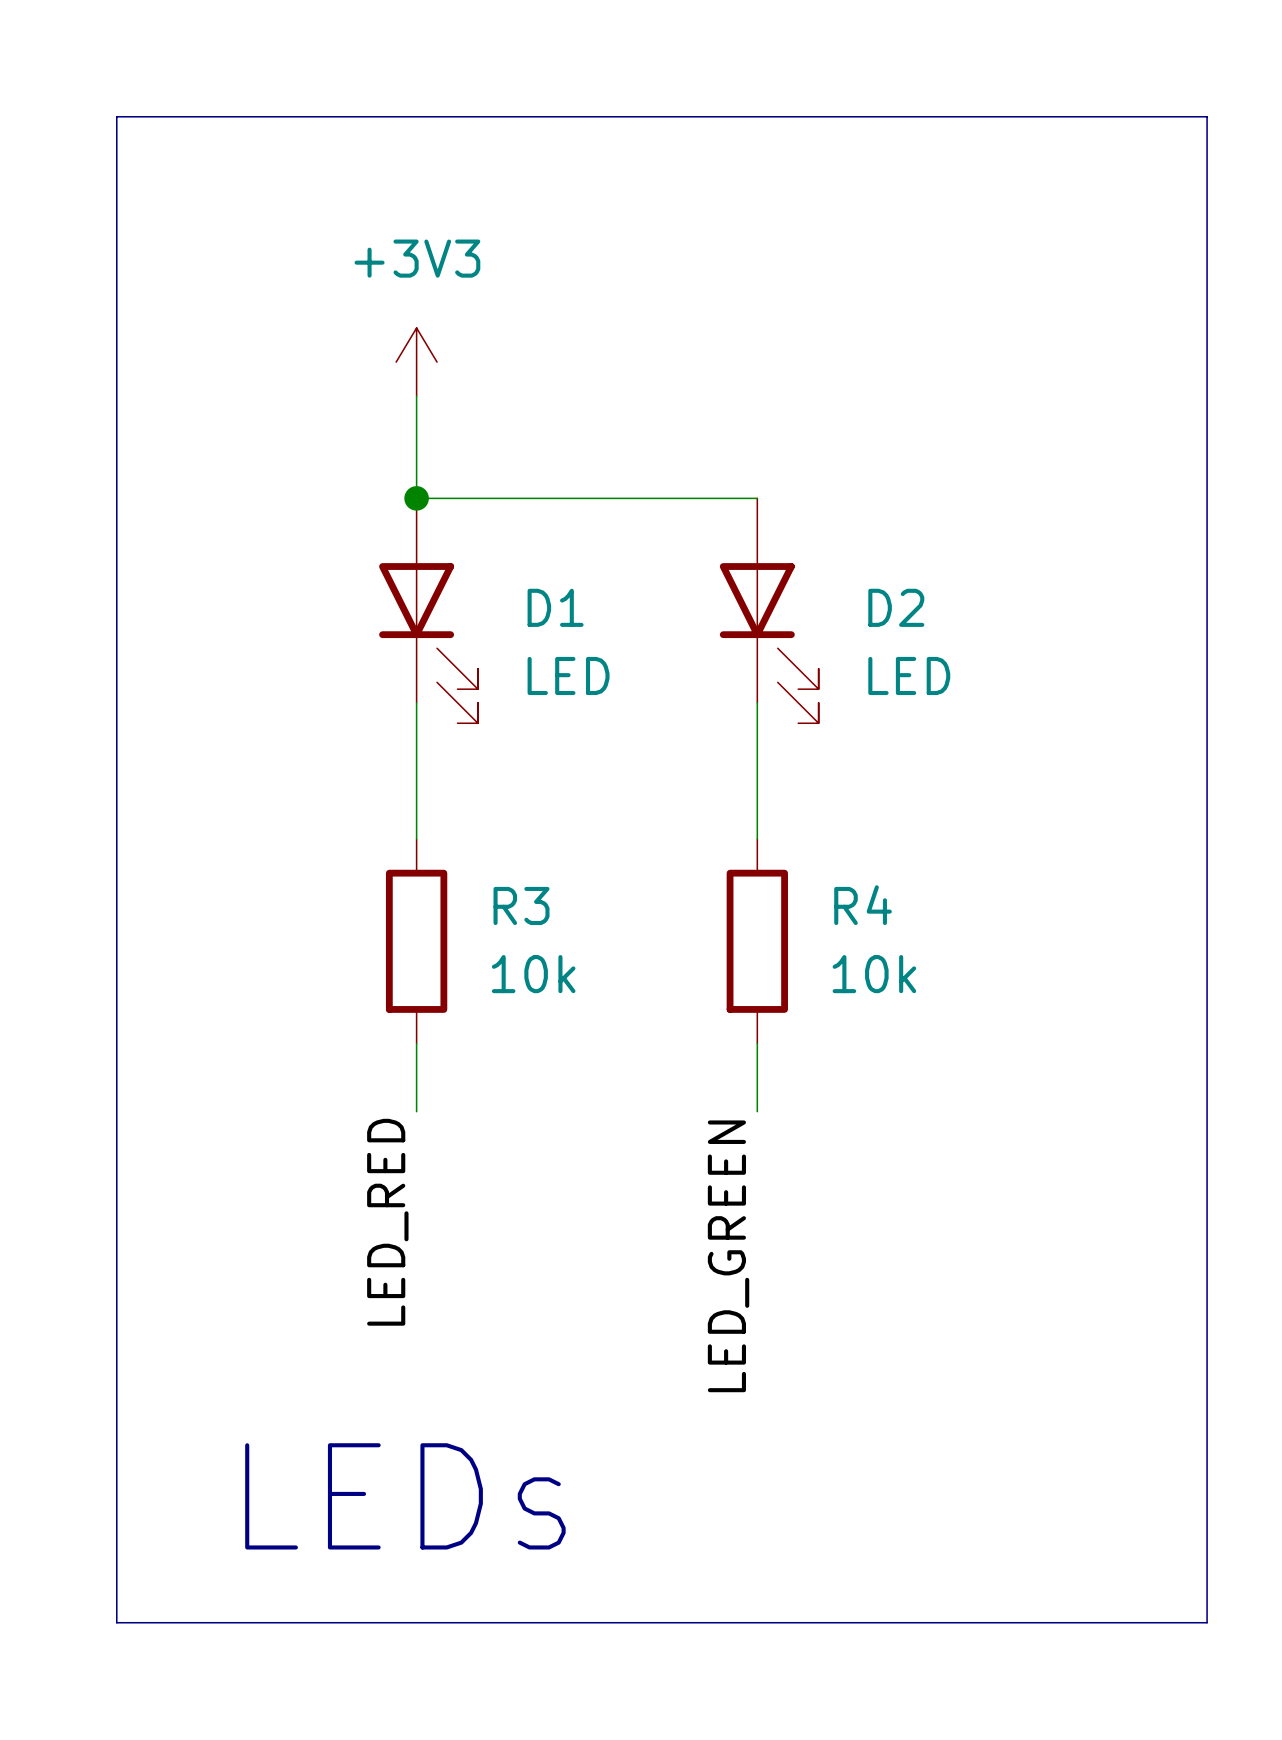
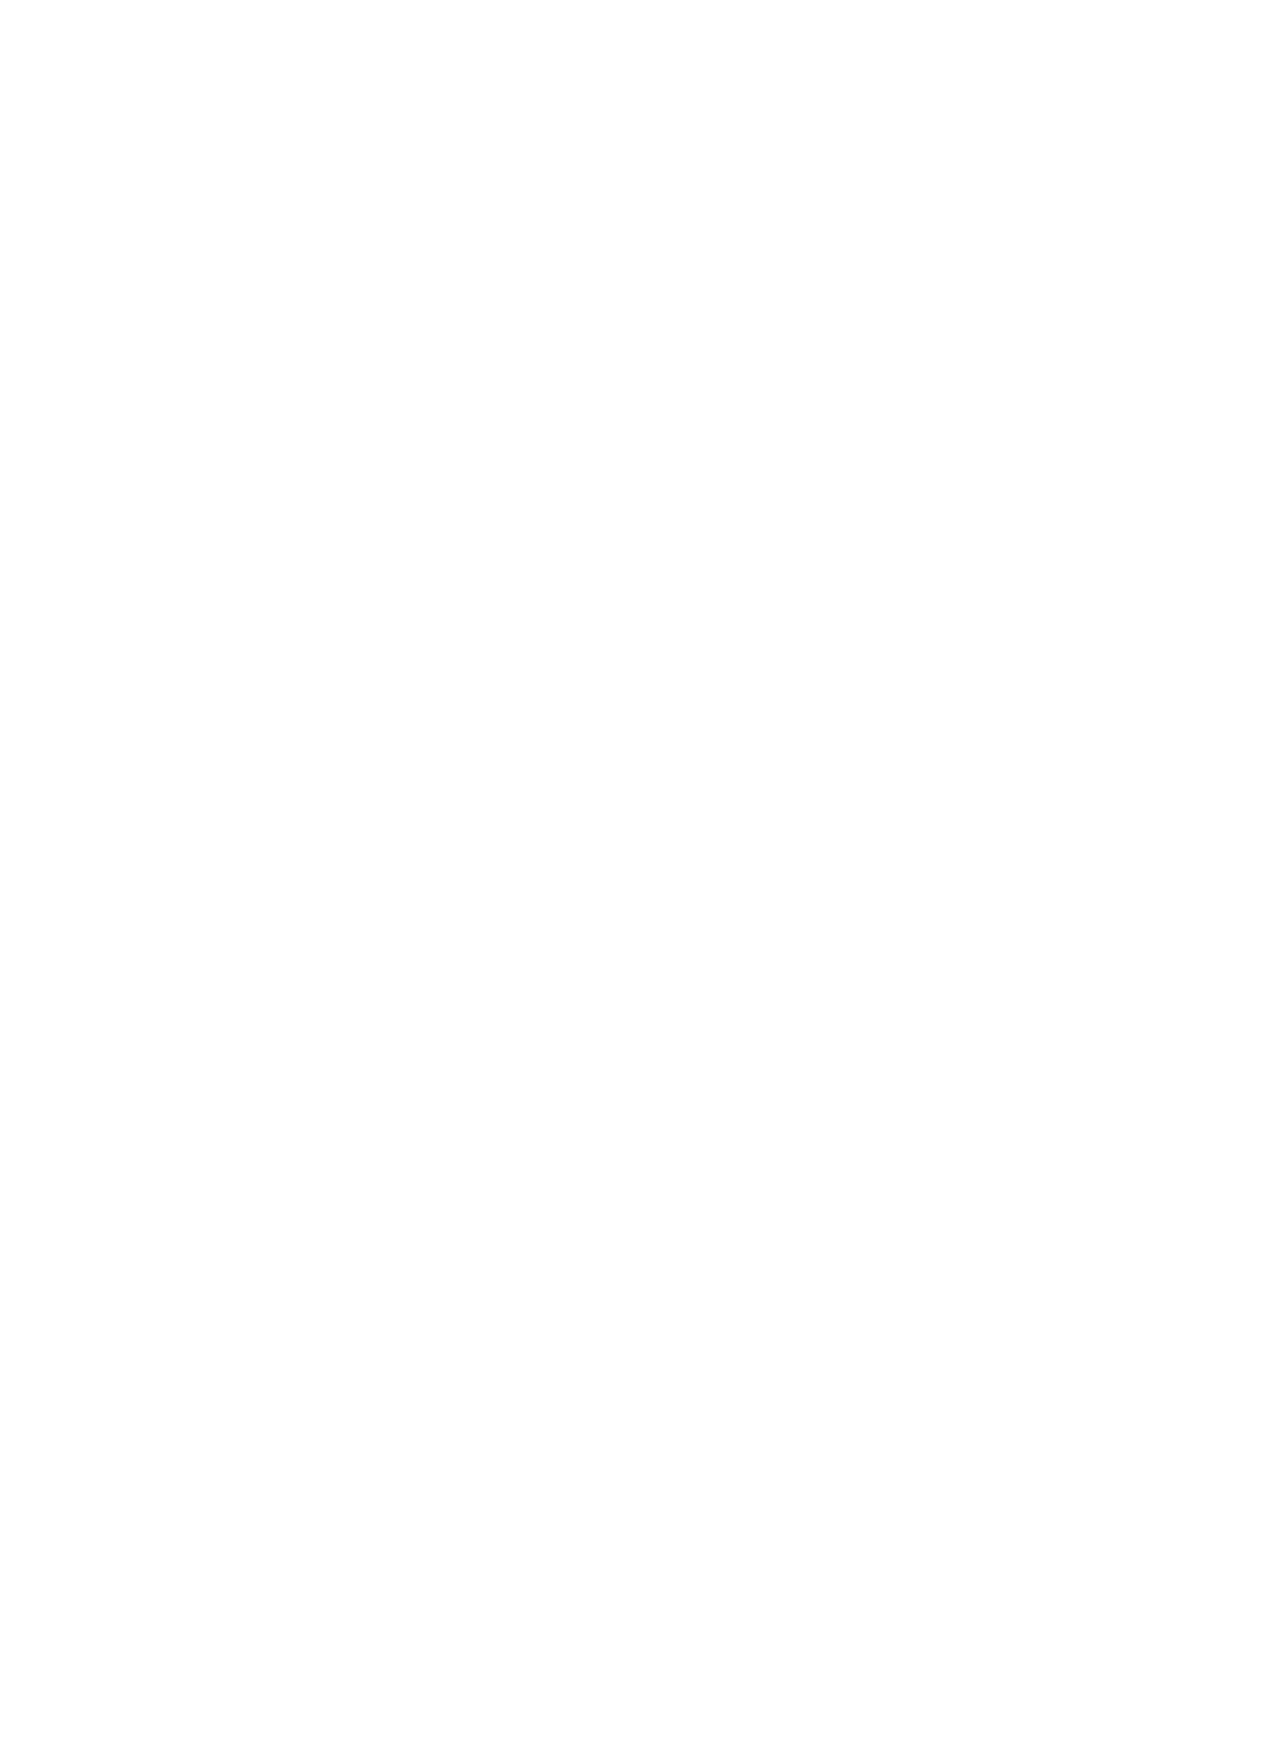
line: (116, 116) (1207, 116) (1207, 1622) (116, 1622) (116, 116) -> none
power symbol: +3V3 (416, 362) -> none
wire: (416, 396) (416, 498) (757, 498) -> none
junction: (416, 498) -> none
D1: LED (428, 610) -> none
D2: LED (769, 610) -> none
wire: (416, 702) (416, 839) -> none
wire: (757, 702) (757, 839) -> none
R3: 10k (416, 941) -> none
R4: 10k (757, 941) -> none
wire: (416, 1043) (416, 1111) -> none
wire: (757, 1043) (757, 1111) -> none
label: LED_RED (387, 1222) -> none
label: LED_GREEN (728, 1256) -> none
text: LEDs (405, 1496) -> none

